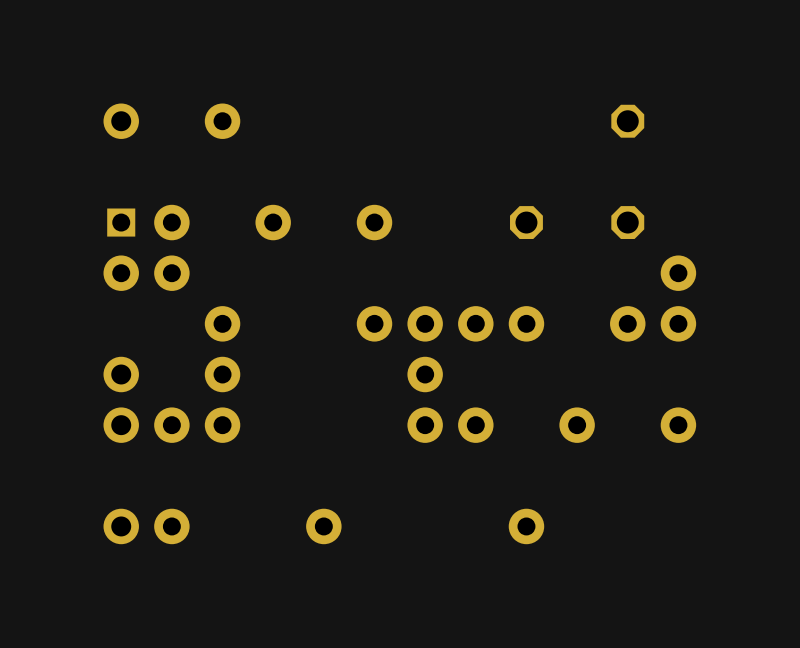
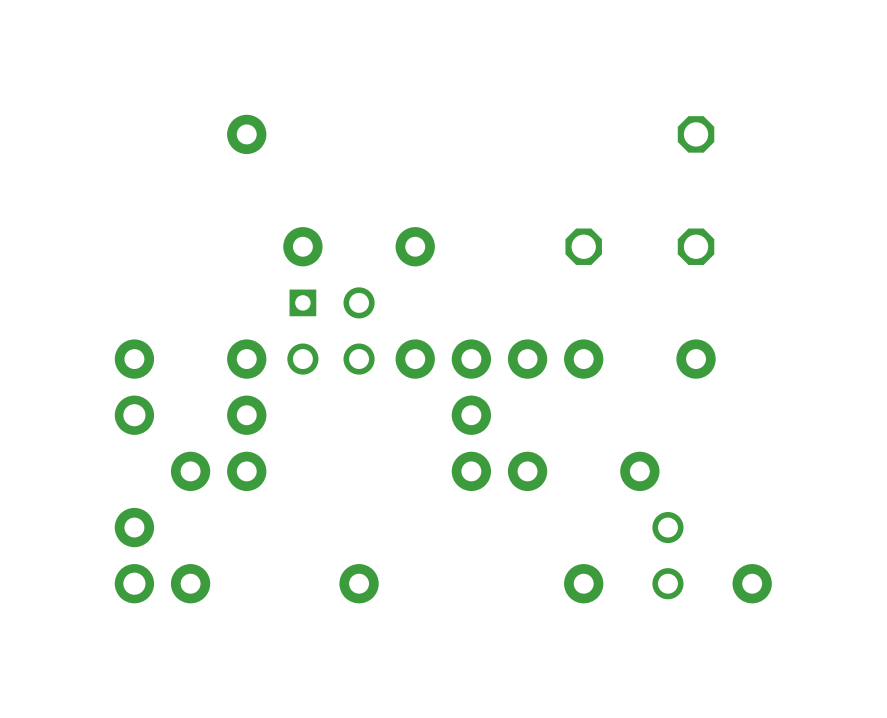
part: (121, 121) -> none
part: (171, 247) -> none
part: (121, 249) -> none
part: none -> (332, 302)
part: (678, 298) -> none
part: none -> (134, 359)
part: none -> (330, 359)
part: (121, 425) -> none
part position: (678, 425) -> (752, 583)
part: none -> (134, 527)
part: none -> (667, 555)

